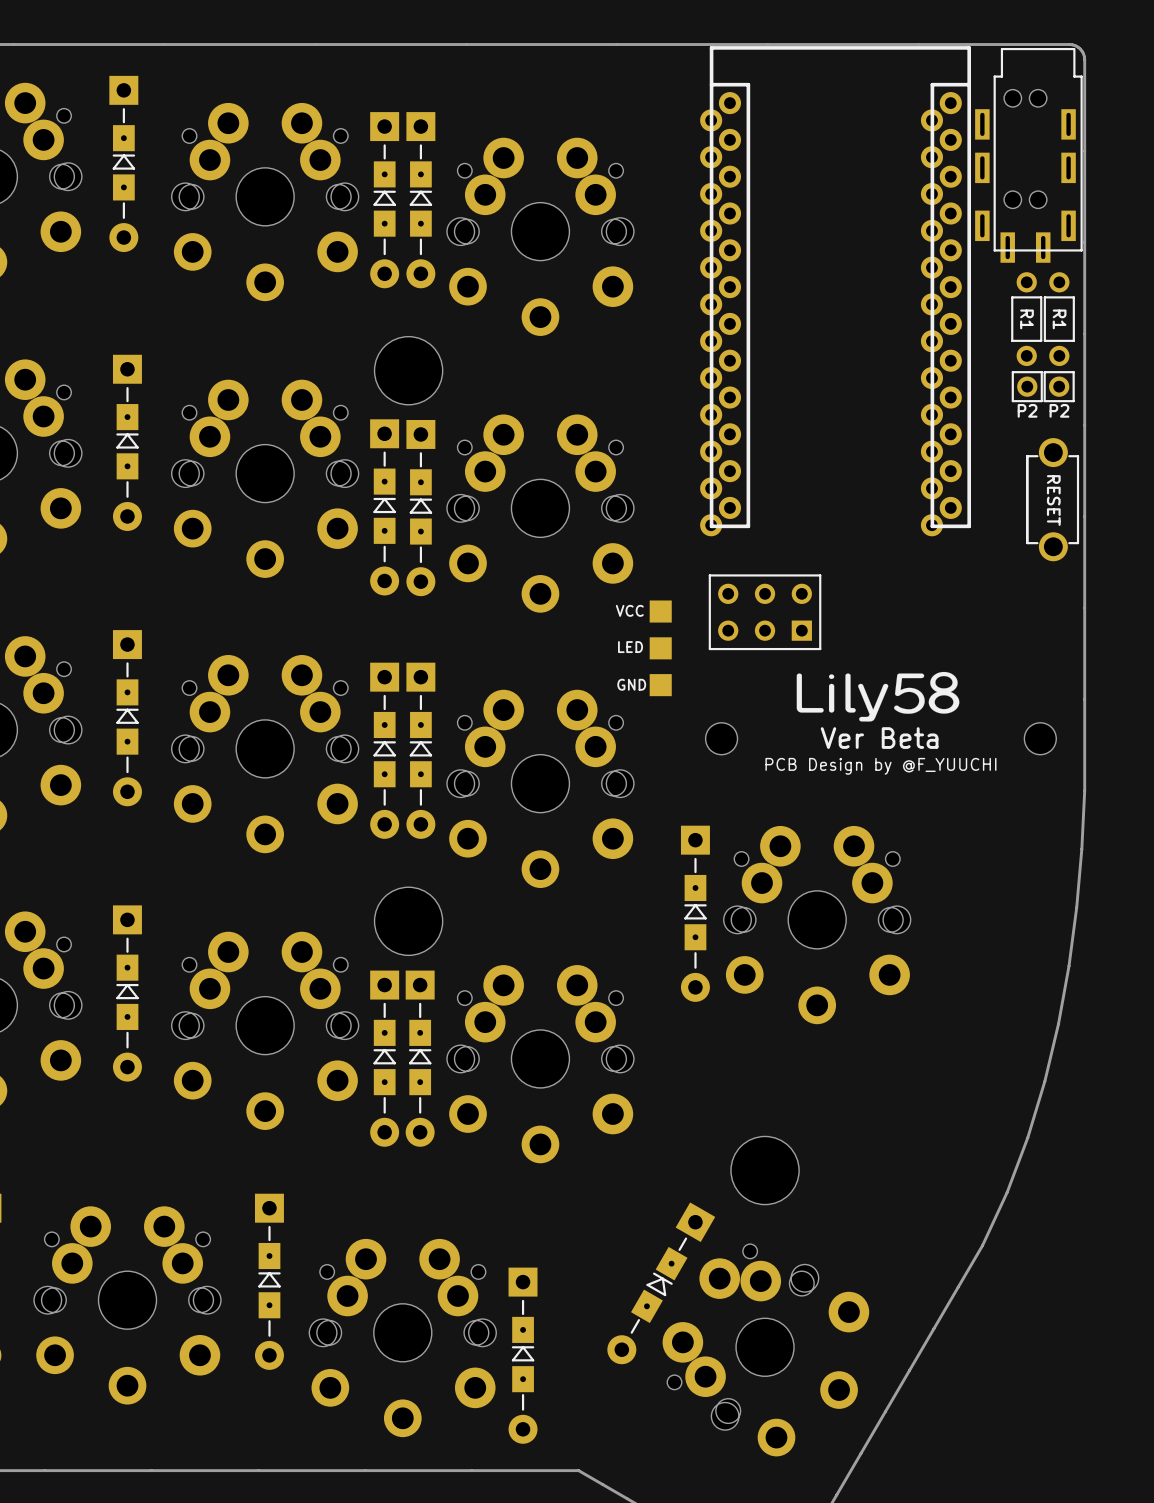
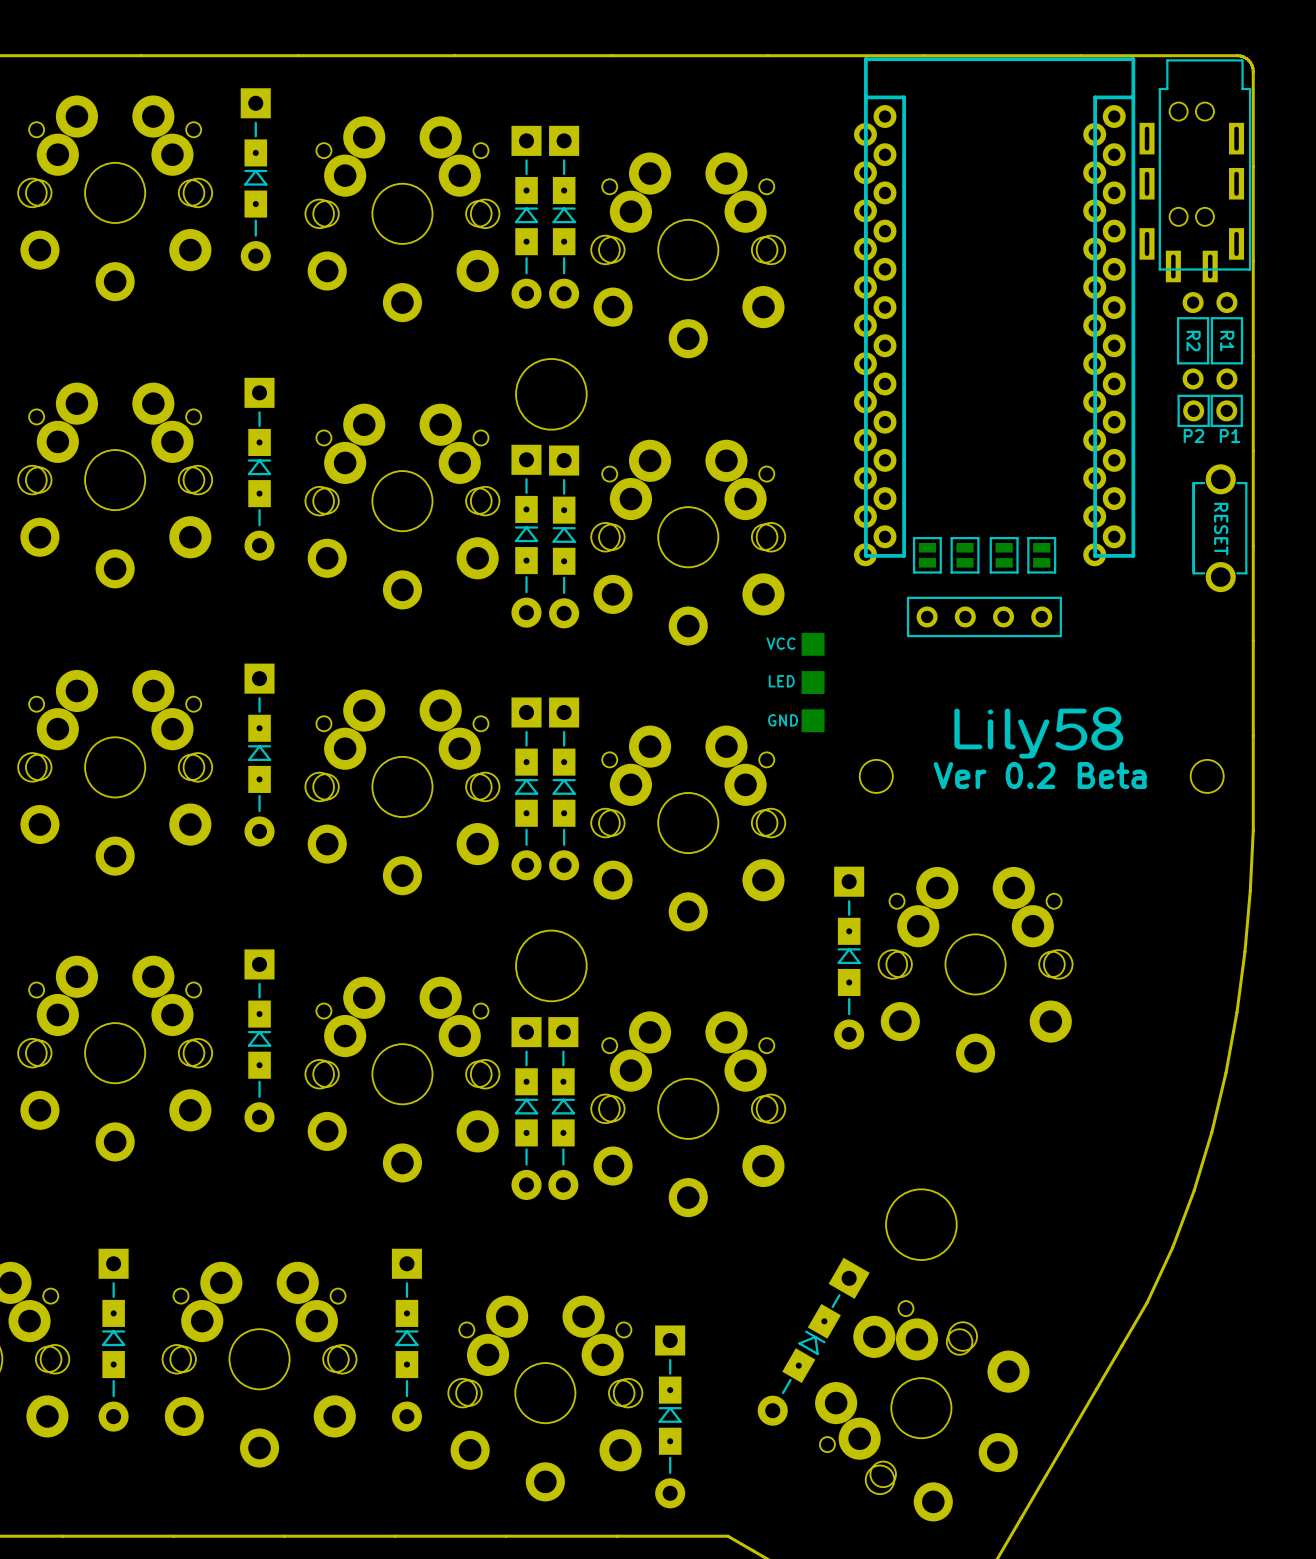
part text: R1 (1027, 319) -> R2 (1193, 341)
part text: P2 (1059, 410) -> none
part text: none -> P1 (1230, 436)
part: none -> (927, 555)
part: none -> (965, 555)
part: none -> (1004, 555)
part: none -> (1041, 555)
part: none -> (984, 616)
part: (765, 612) -> none
text: Ver Beta (879, 738) -> Ver 0.2 Beta (1040, 775)
text: PCB Design by @F_YUUCHI (880, 766) -> none

